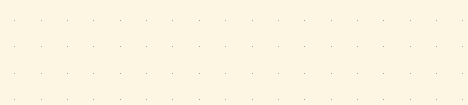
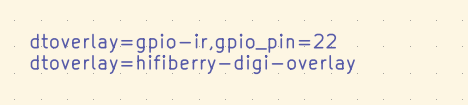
text: none -> dtoverlay=gpio-ir,gpio_pin=22 (183, 43)
text: none -> dtoverlay=hifiberry-digi-overlay (192, 64)

